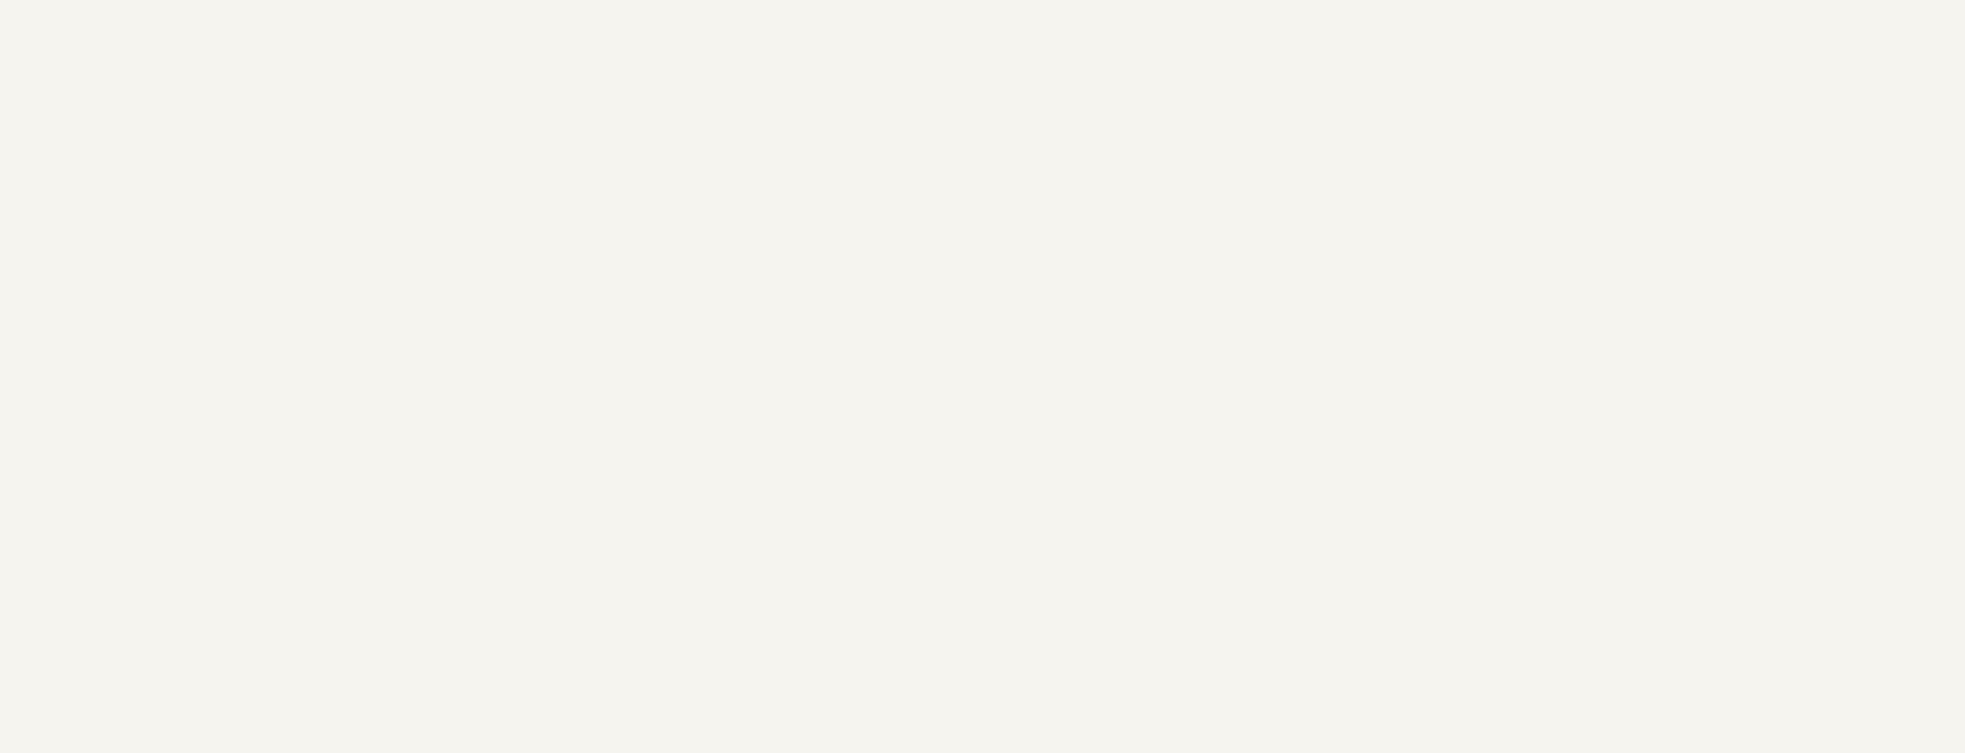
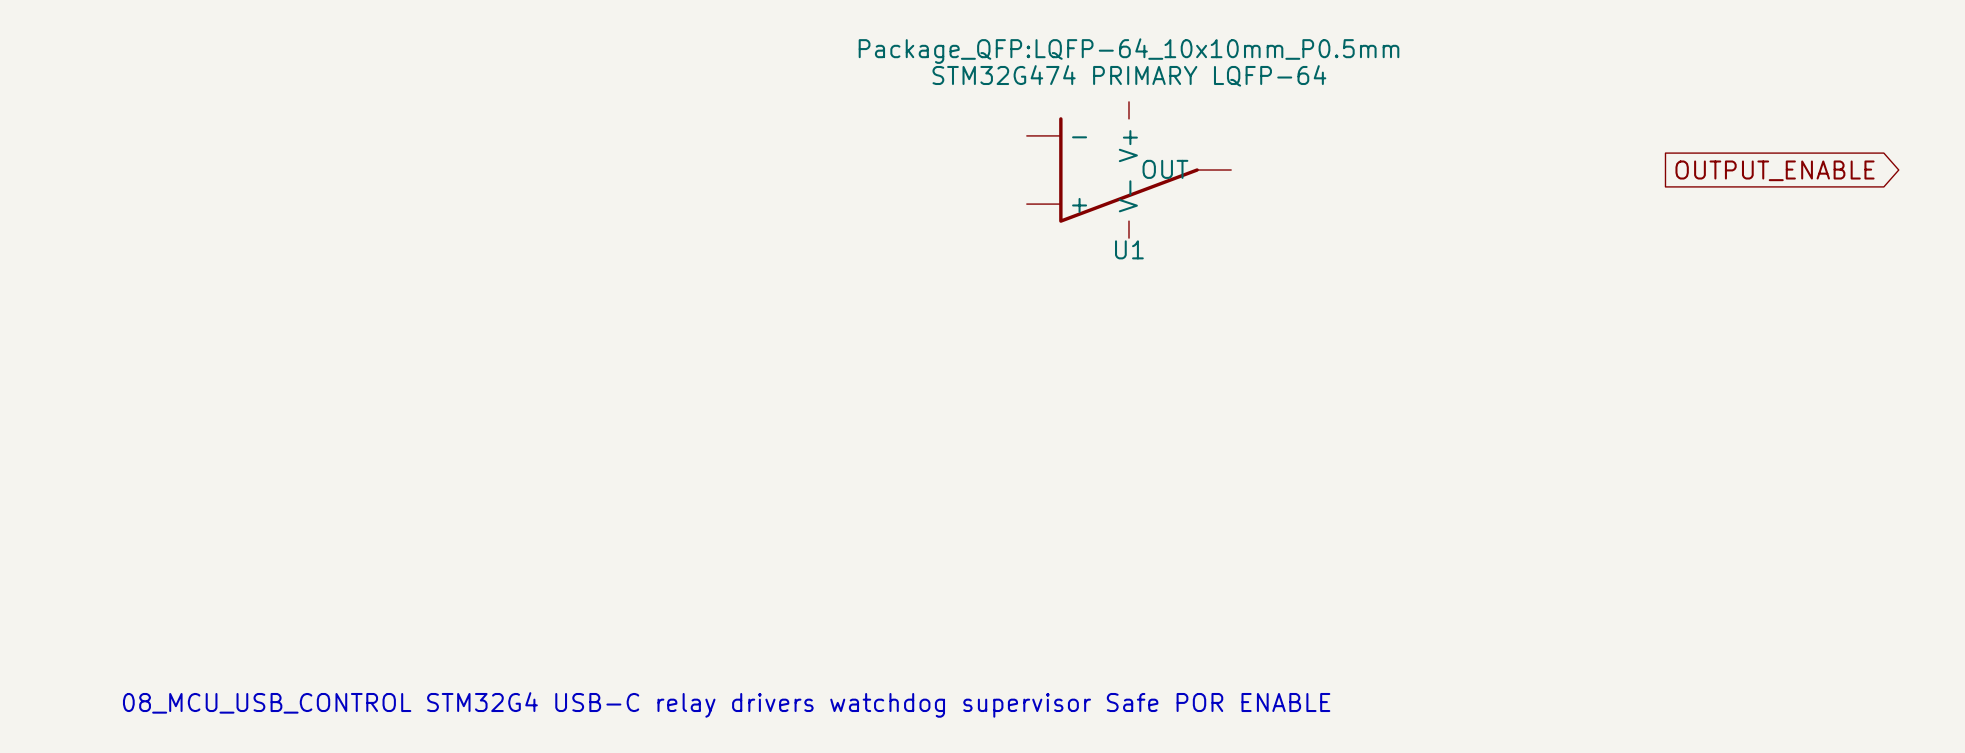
U1: none -> STM32G474 PRIMARY LQFP-64 (1128, 170)
global label: none -> OUTPUT_ENABLE (1775, 170)
text: none -> 08_MCU_USB_CONTROL STM32G4 USB-C relay drivers watchdog supervisor Safe POR ENABLE (726, 704)

